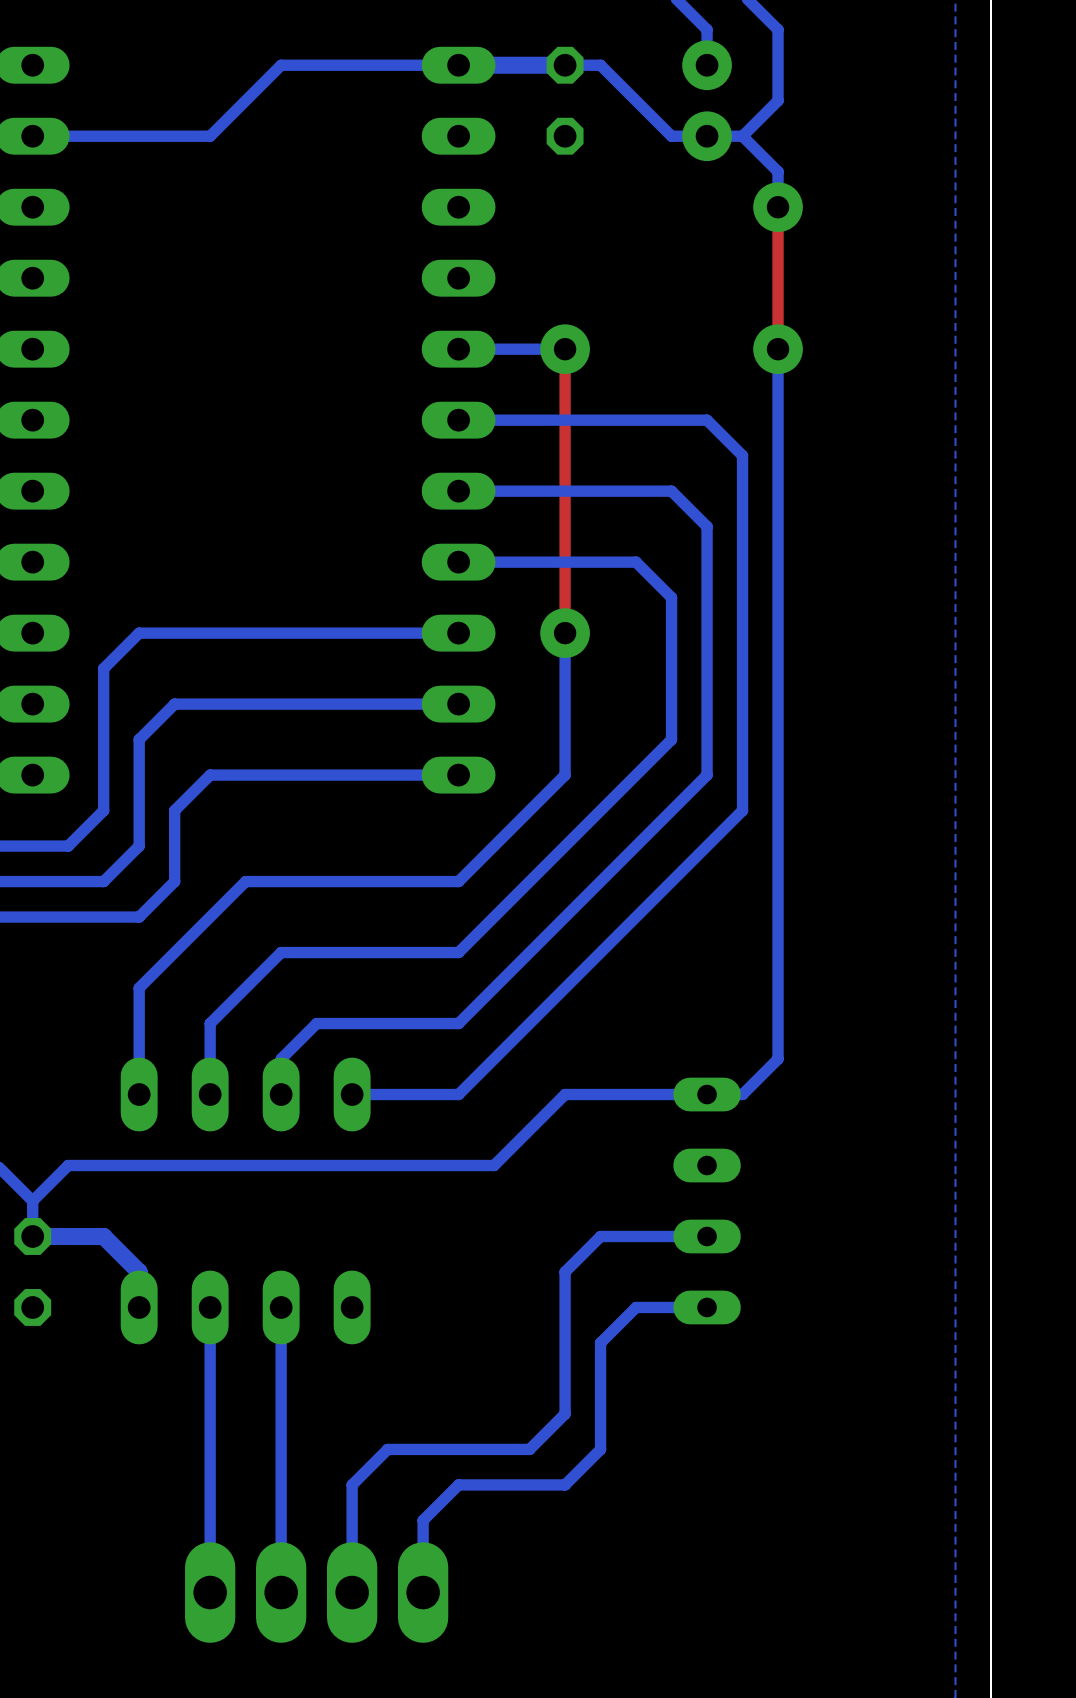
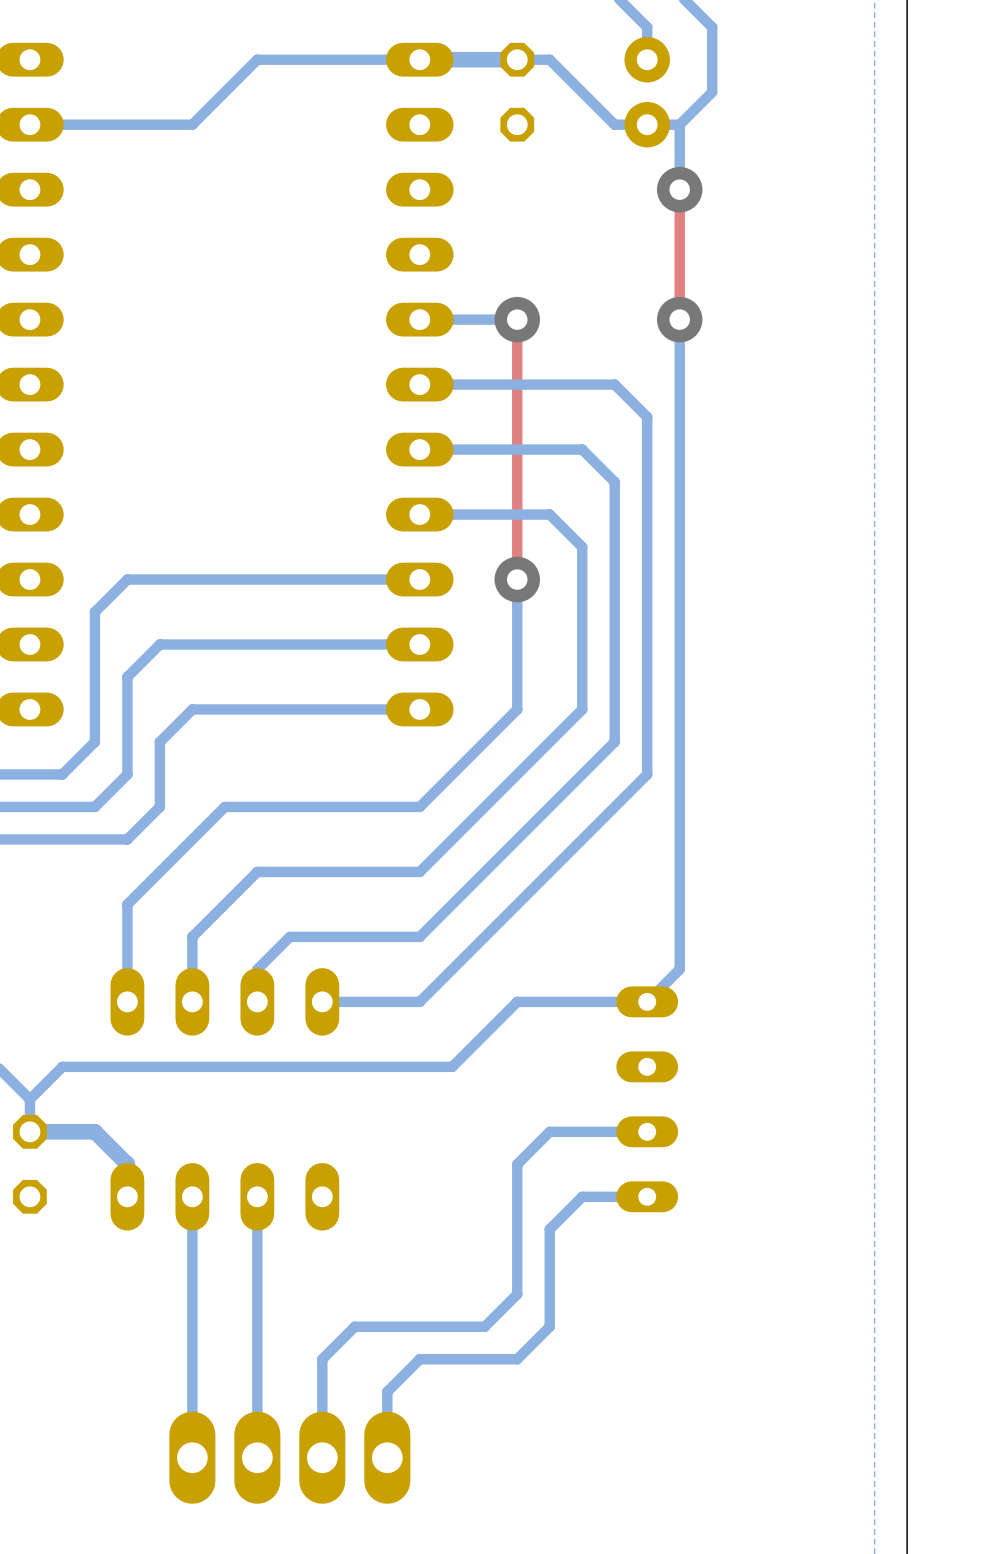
bottom track: (742, 136) (778, 171) (778, 207) -> (679, 124) (679, 189)
top track: (778, 207) (778, 349) -> (679, 189) (679, 319)
via position: (778, 207) -> (679, 189)
bottom track: none -> (679, 319) (679, 417)
bottom track: (778, 349) (778, 1059) (742, 1094) (707, 1094) -> (679, 741) (679, 969) (647, 1001)
via position: (778, 349) -> (679, 319)
bottom track: (671, 420) (707, 420) (742, 455) -> (614, 384) (647, 417) (647, 482)
bottom track: (636, 491) (671, 491) (707, 526) -> (582, 449) (614, 482) (614, 547)
bottom track: (600, 562) (636, 562) (671, 597) -> (549, 514) (582, 547) (582, 709)
bottom track: (671, 739) (636, 775) -> (614, 676) (614, 741)
bottom track: (707, 775) (671, 810) -> none
bottom track: (742, 810) (707, 846) -> (647, 709) (647, 774)

